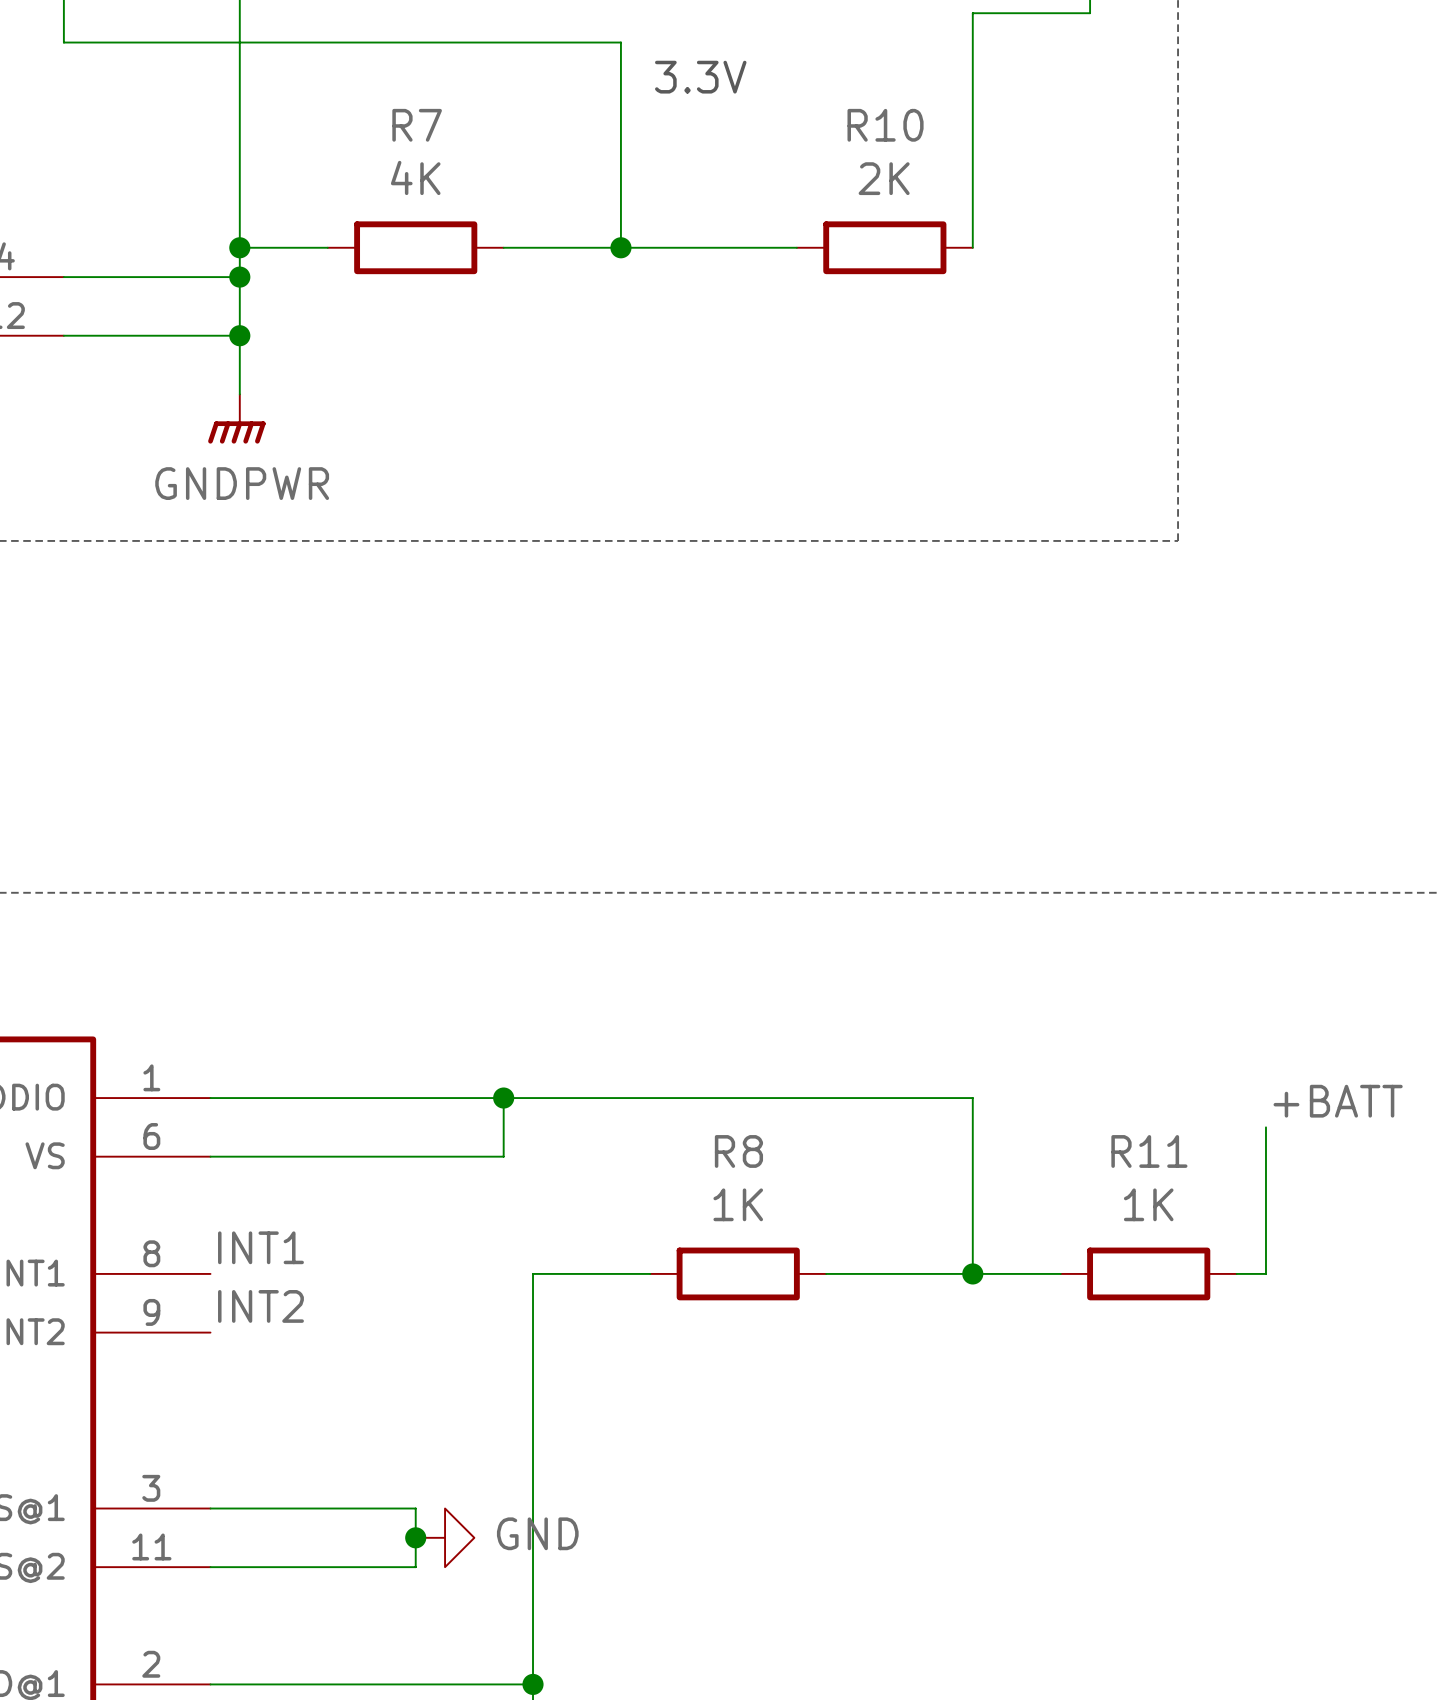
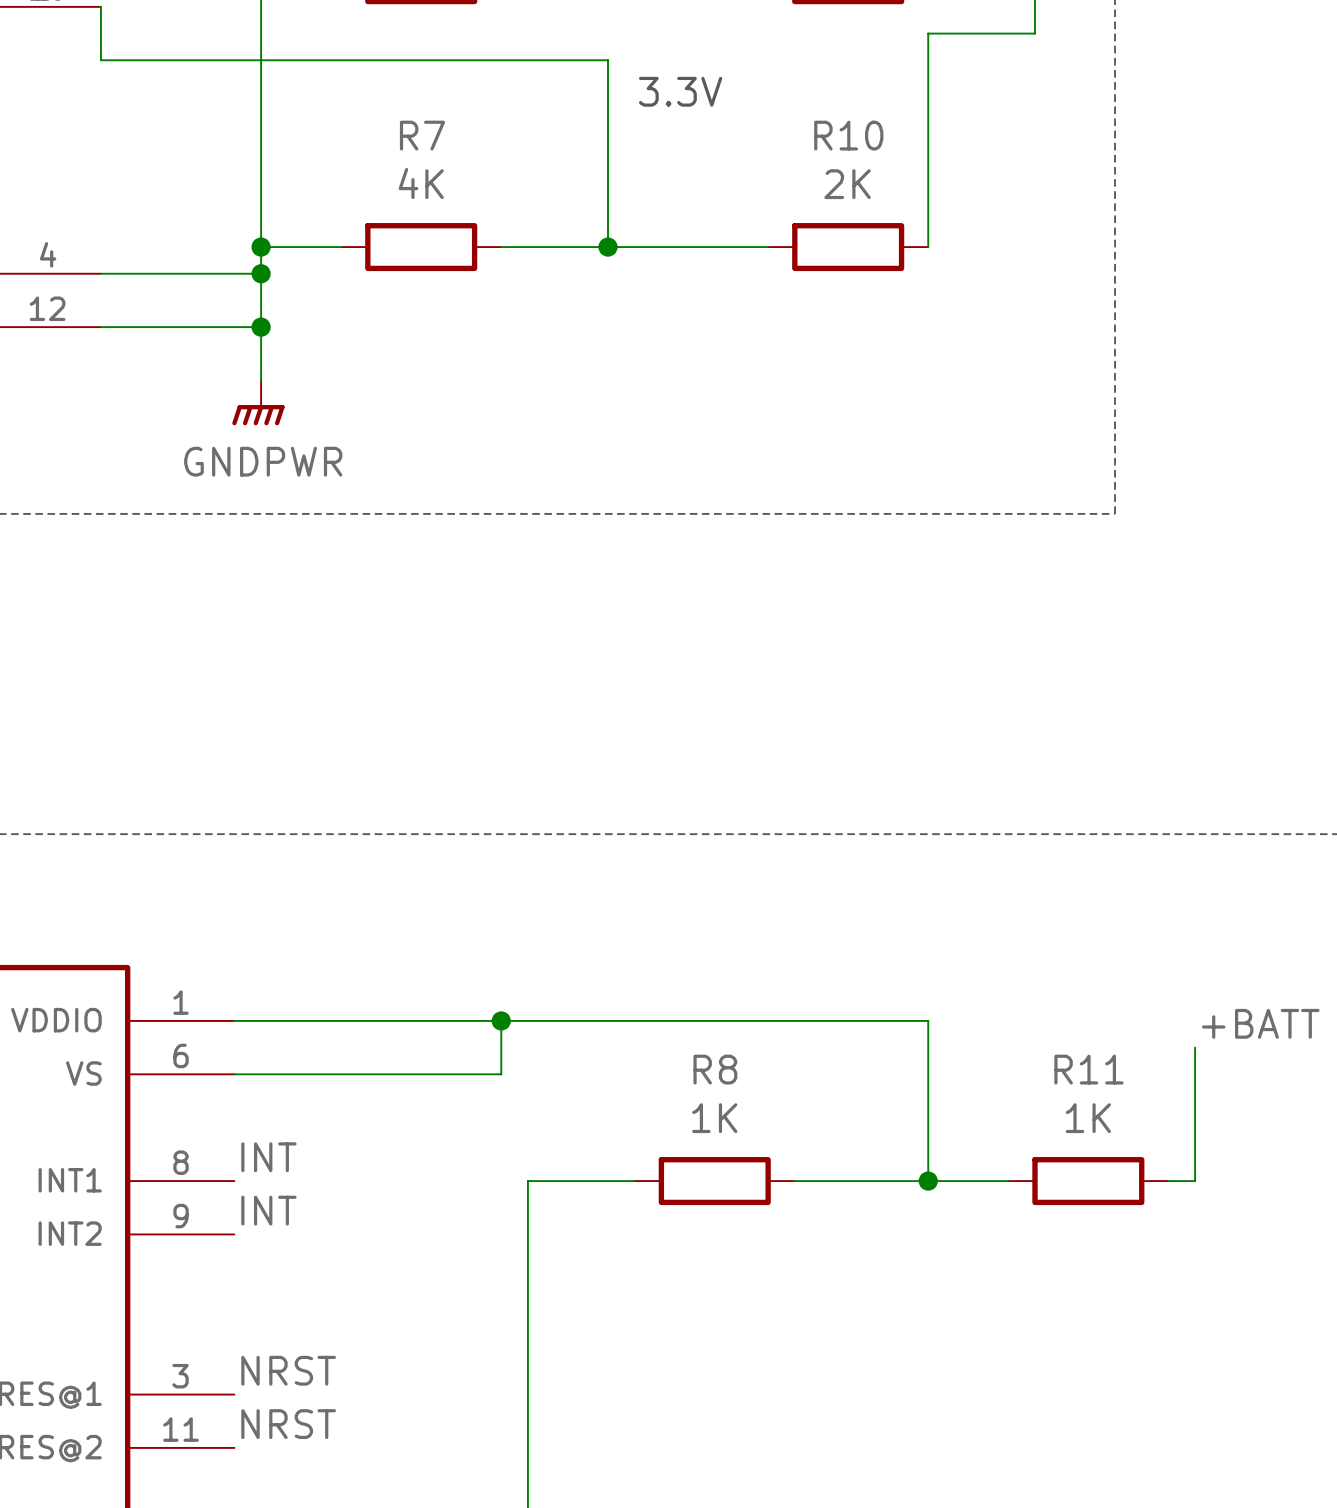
label: INT1 (260, 1247) -> INT (268, 1157)
label: INT2 (260, 1306) -> INT (268, 1210)
label: none -> NRST (288, 1370)
wire: (210, 1508) (415, 1508) (415, 1567) (210, 1567) -> none
junction: (415, 1537) -> none
power symbol: GND (445, 1537) -> none
label: none -> NRST (288, 1424)

